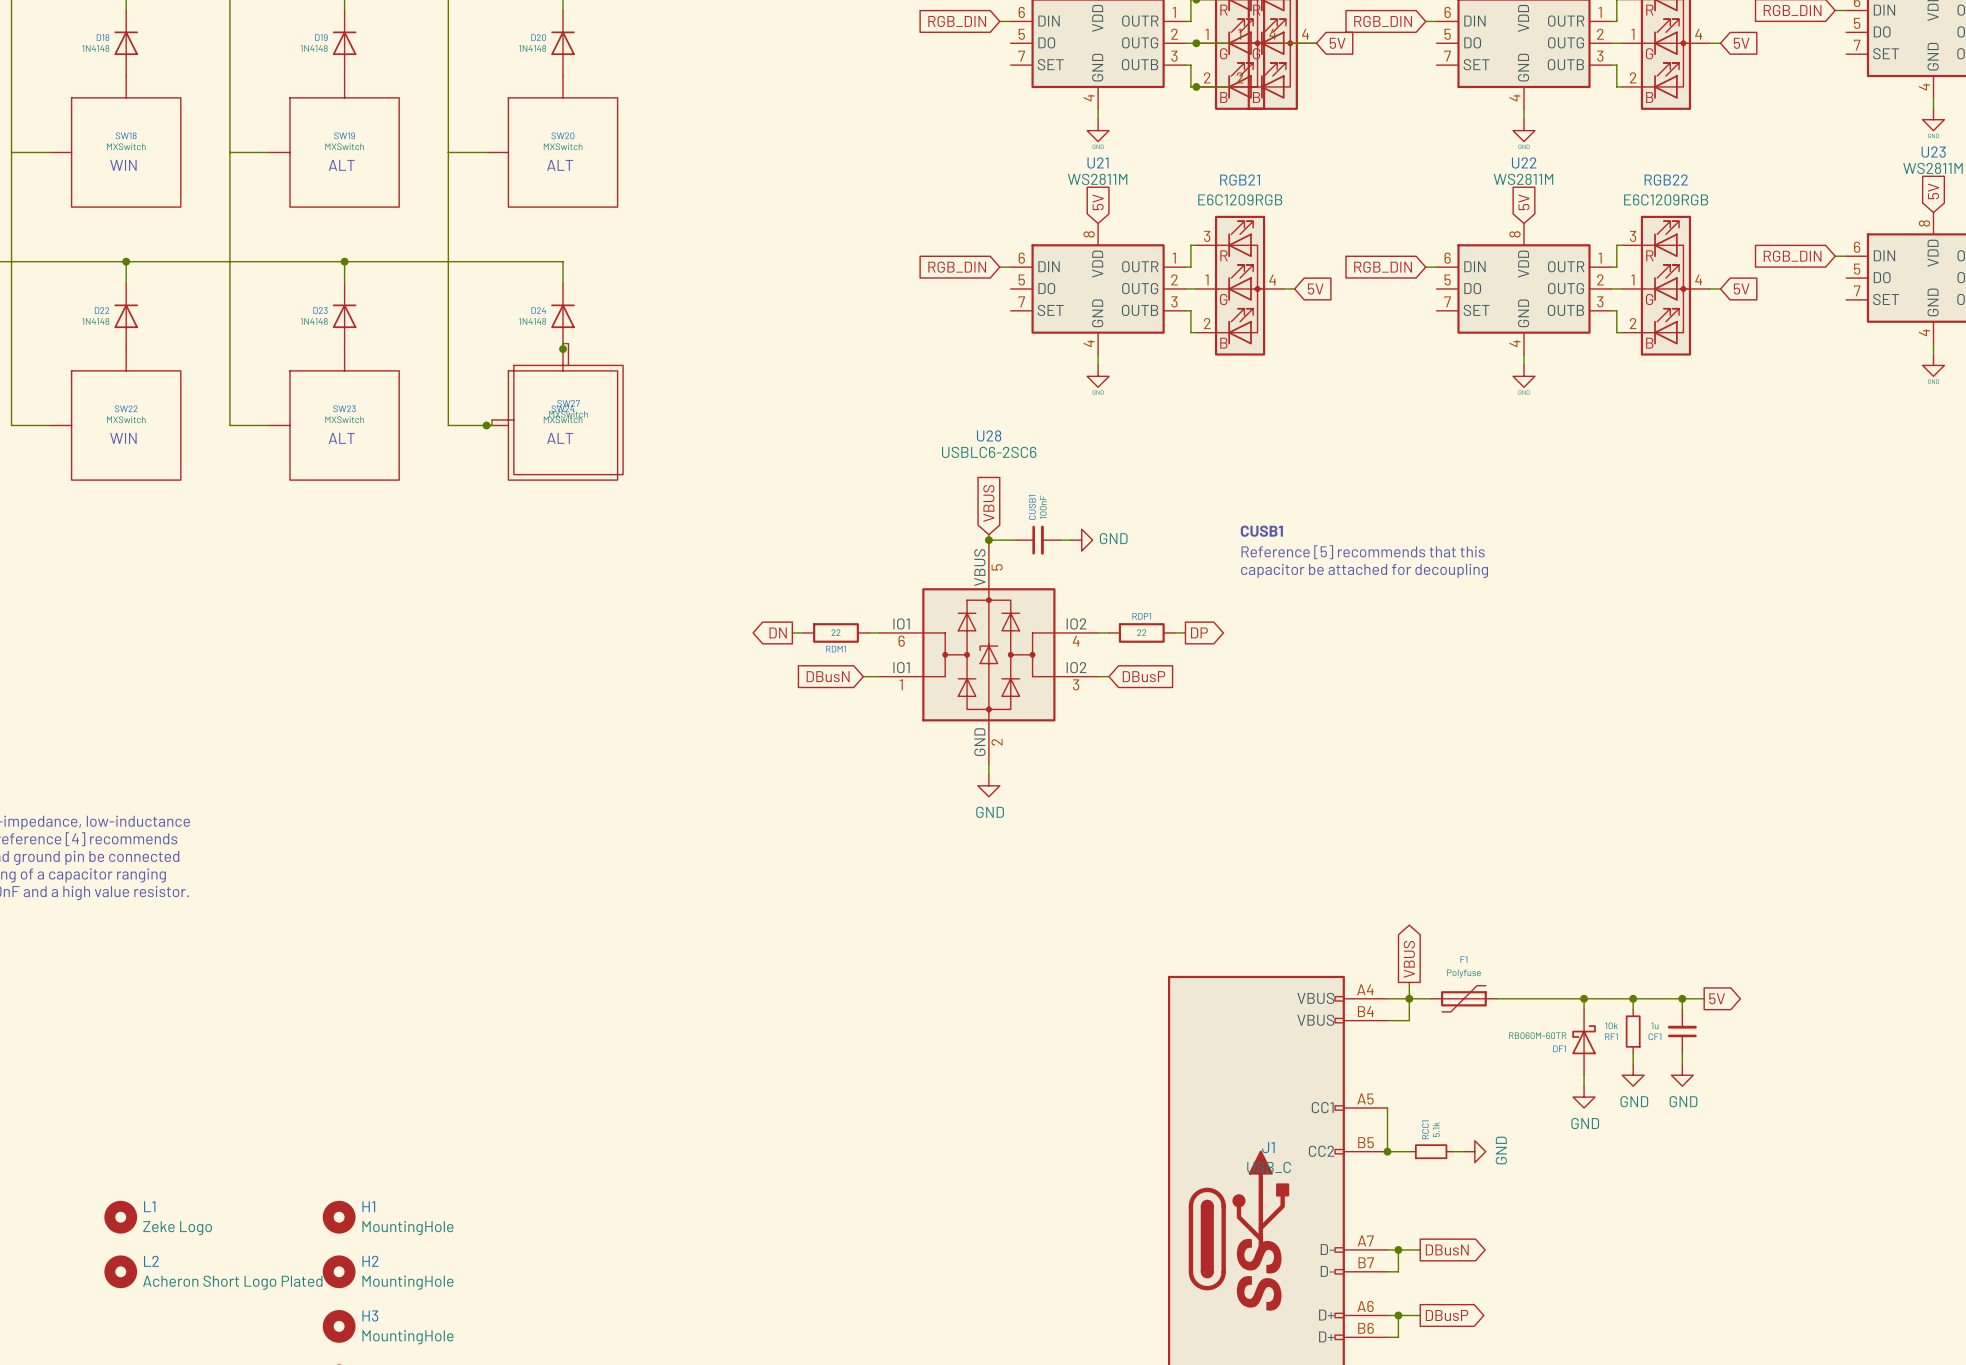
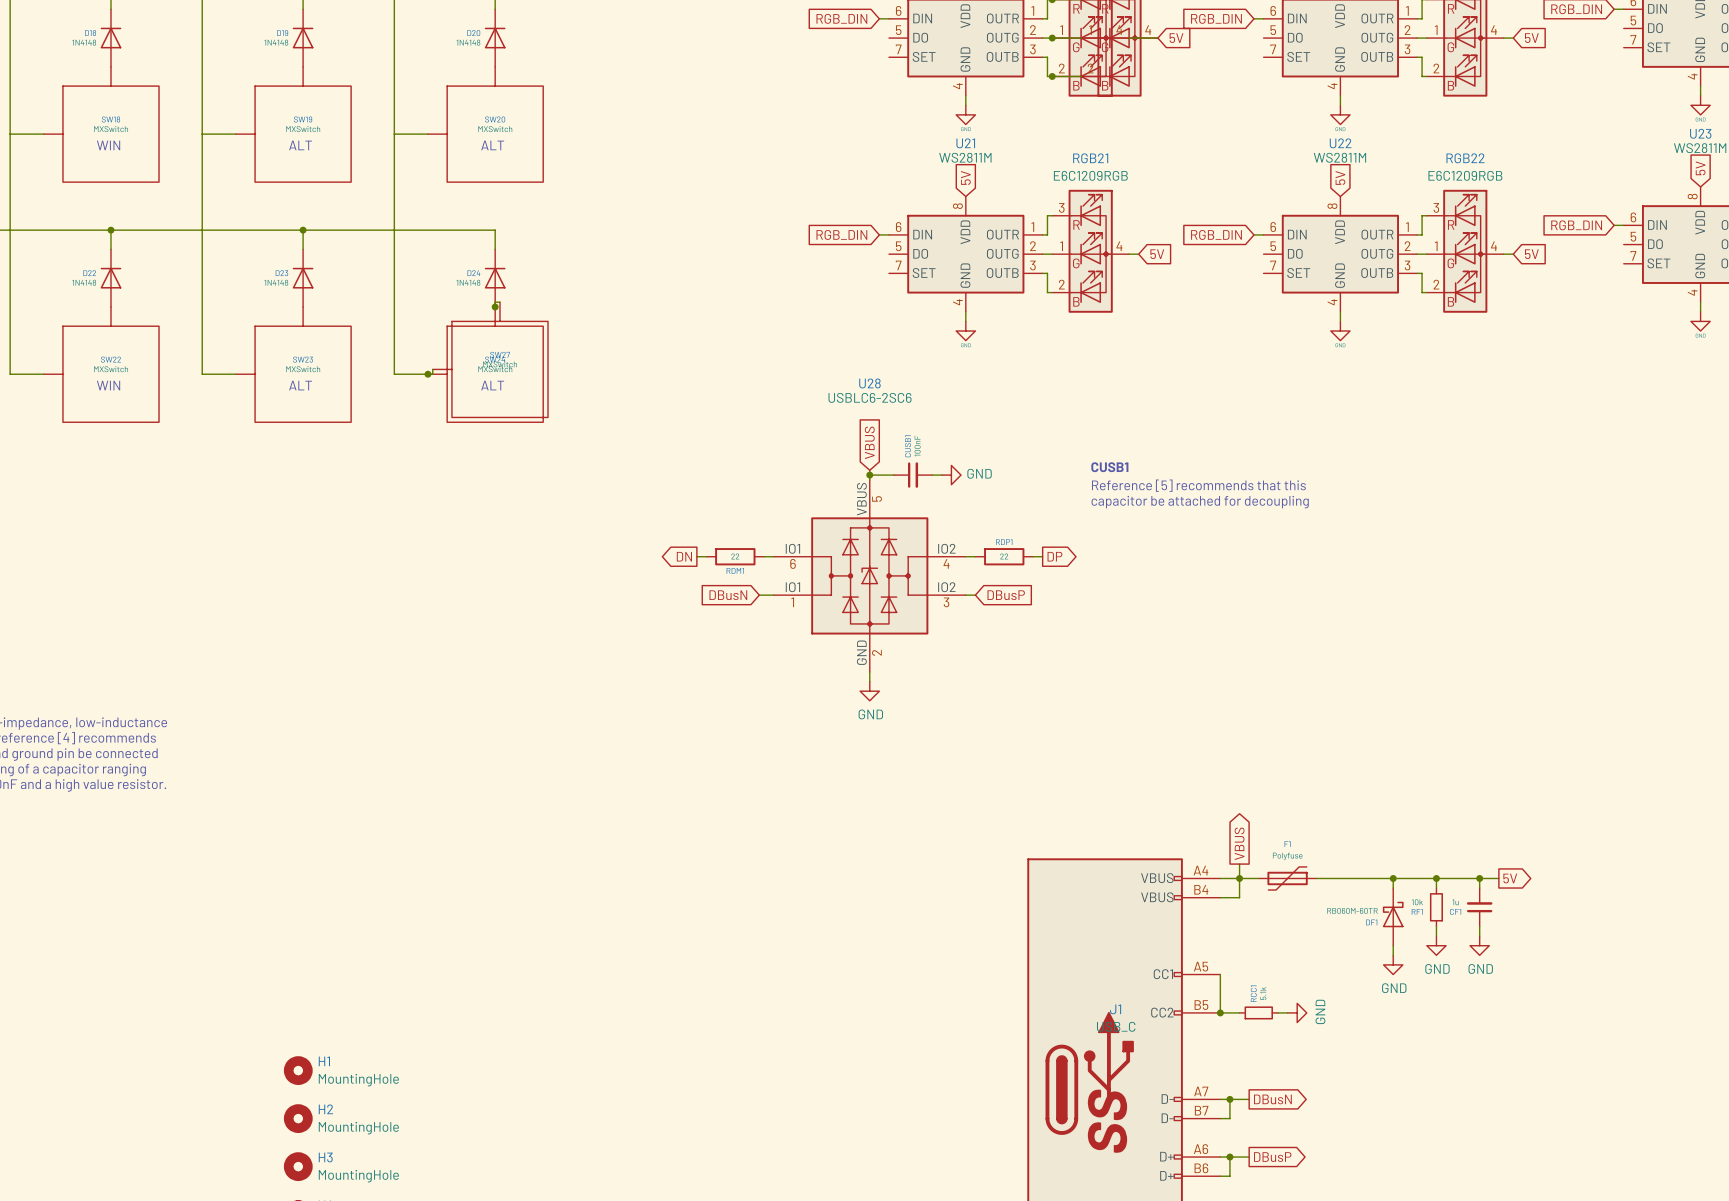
L1: Zeke Logo (120, 1217) -> none
L2: Acheron Short Logo Plated (120, 1271) -> none

